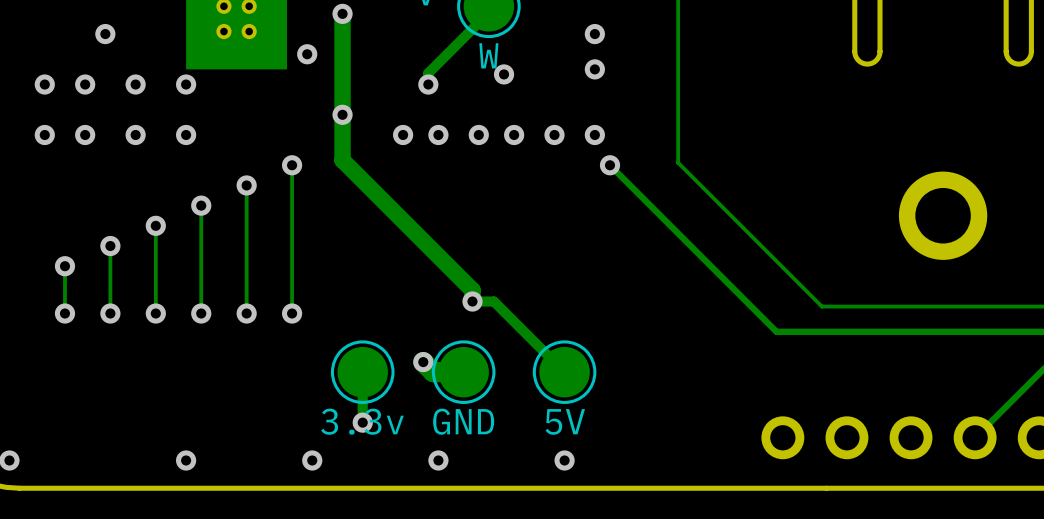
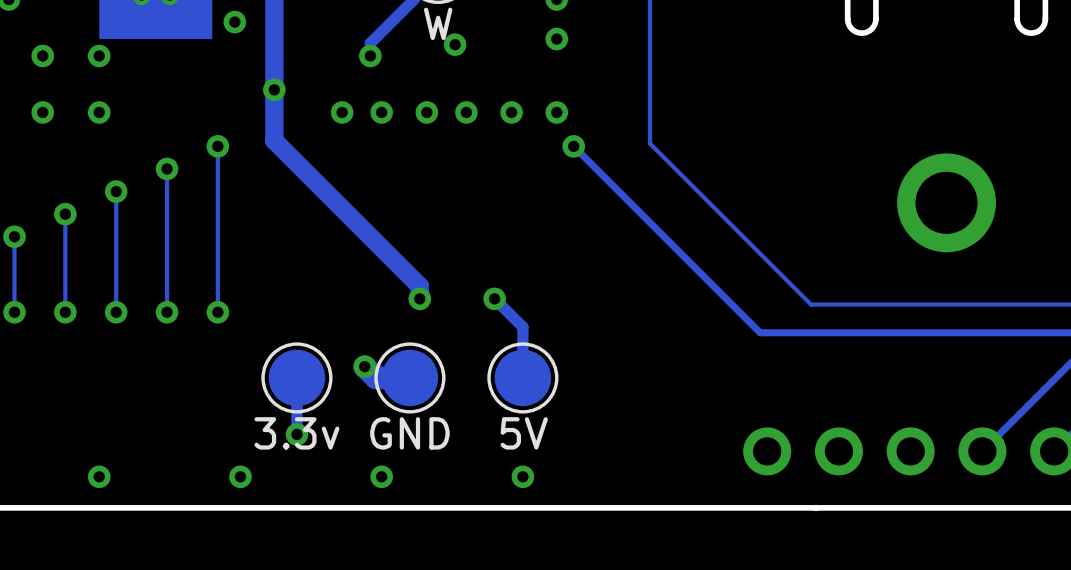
track: (472, 301) (493, 301) (564, 372) -> (494, 298) (522, 327) (522, 377)
via: none -> (494, 298)

